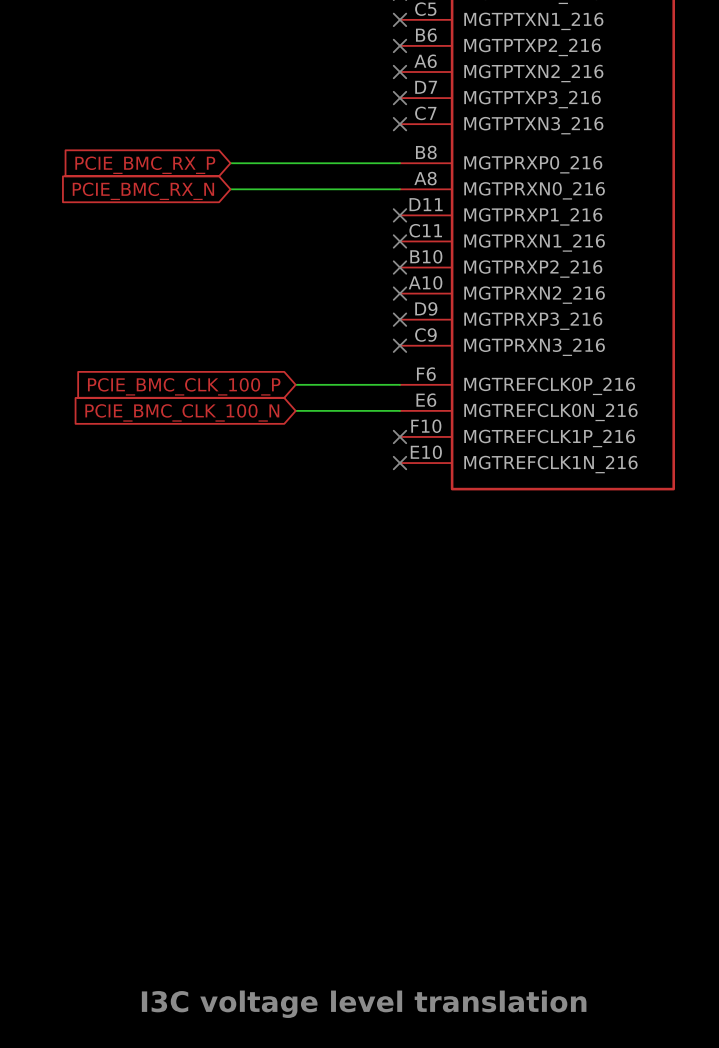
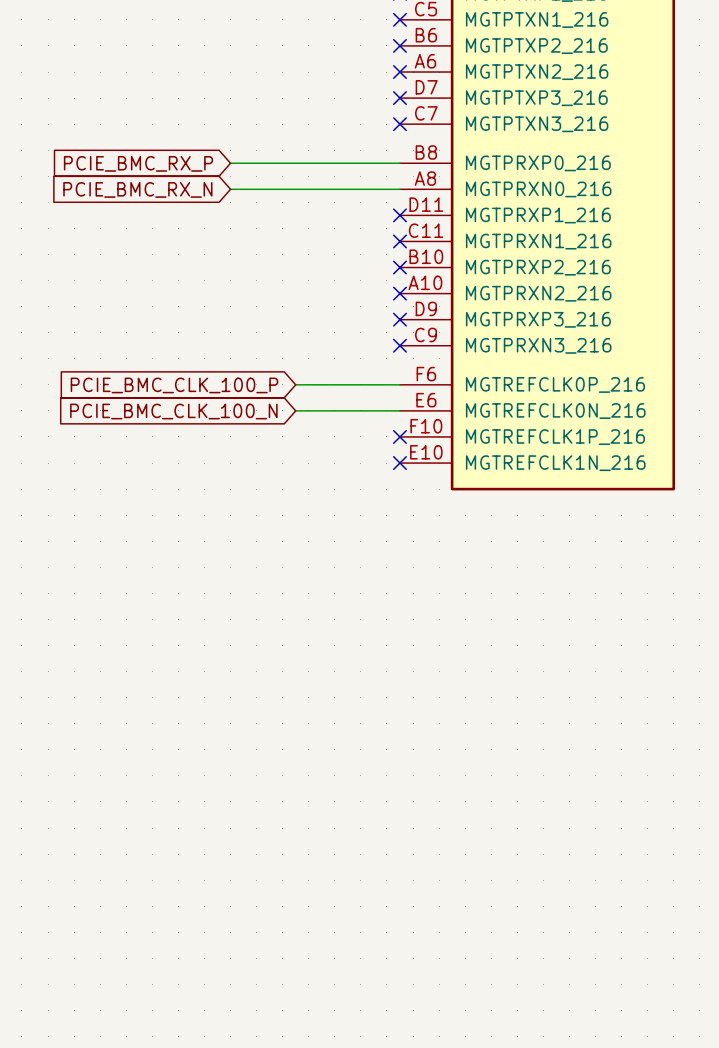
text: I3C voltage level translation (364, 1004) -> none

